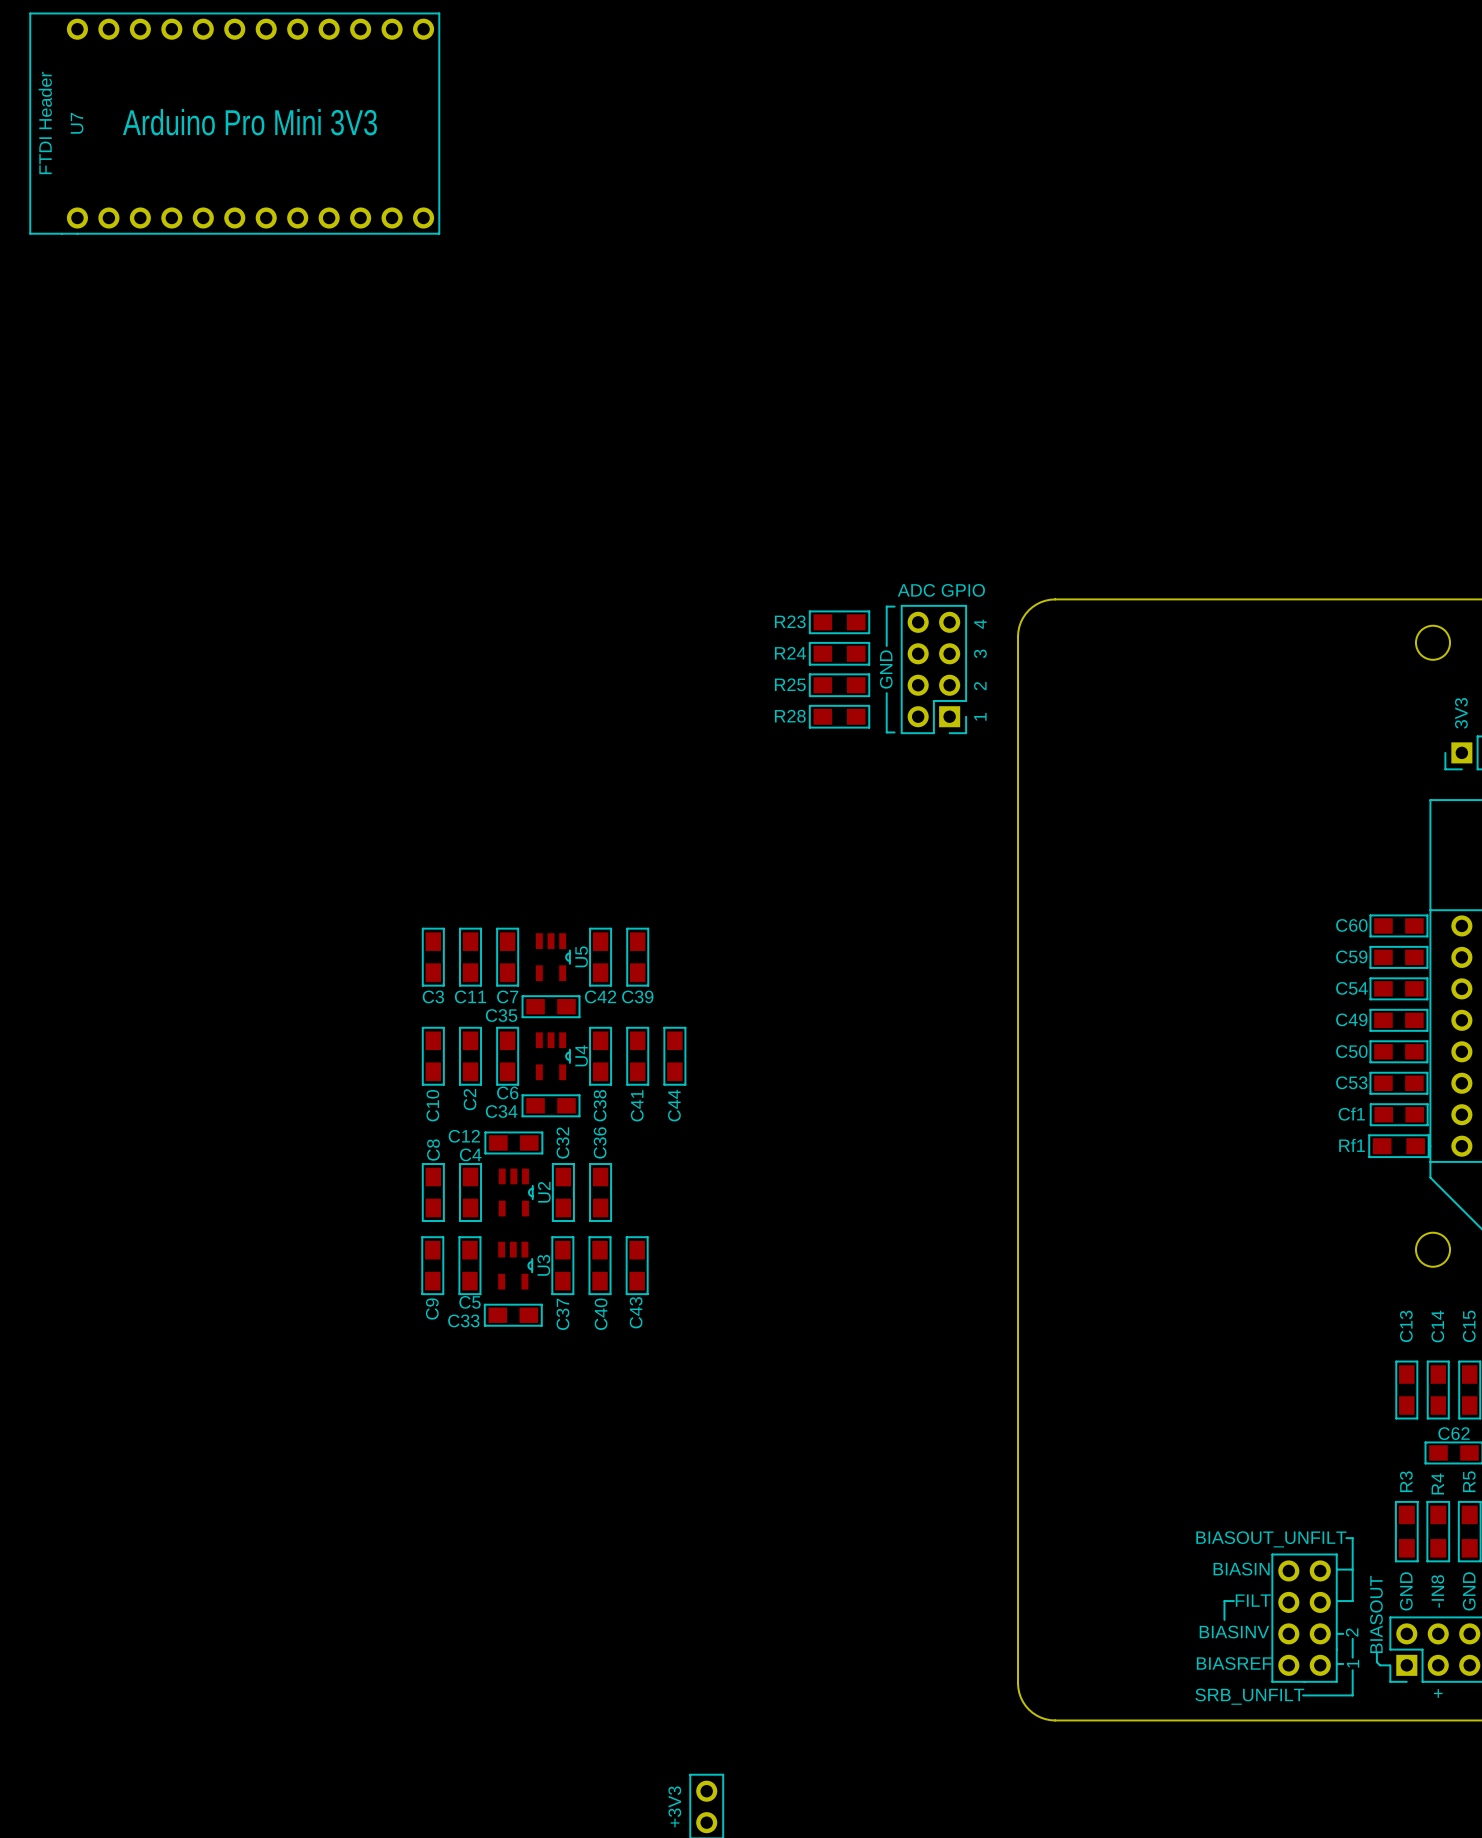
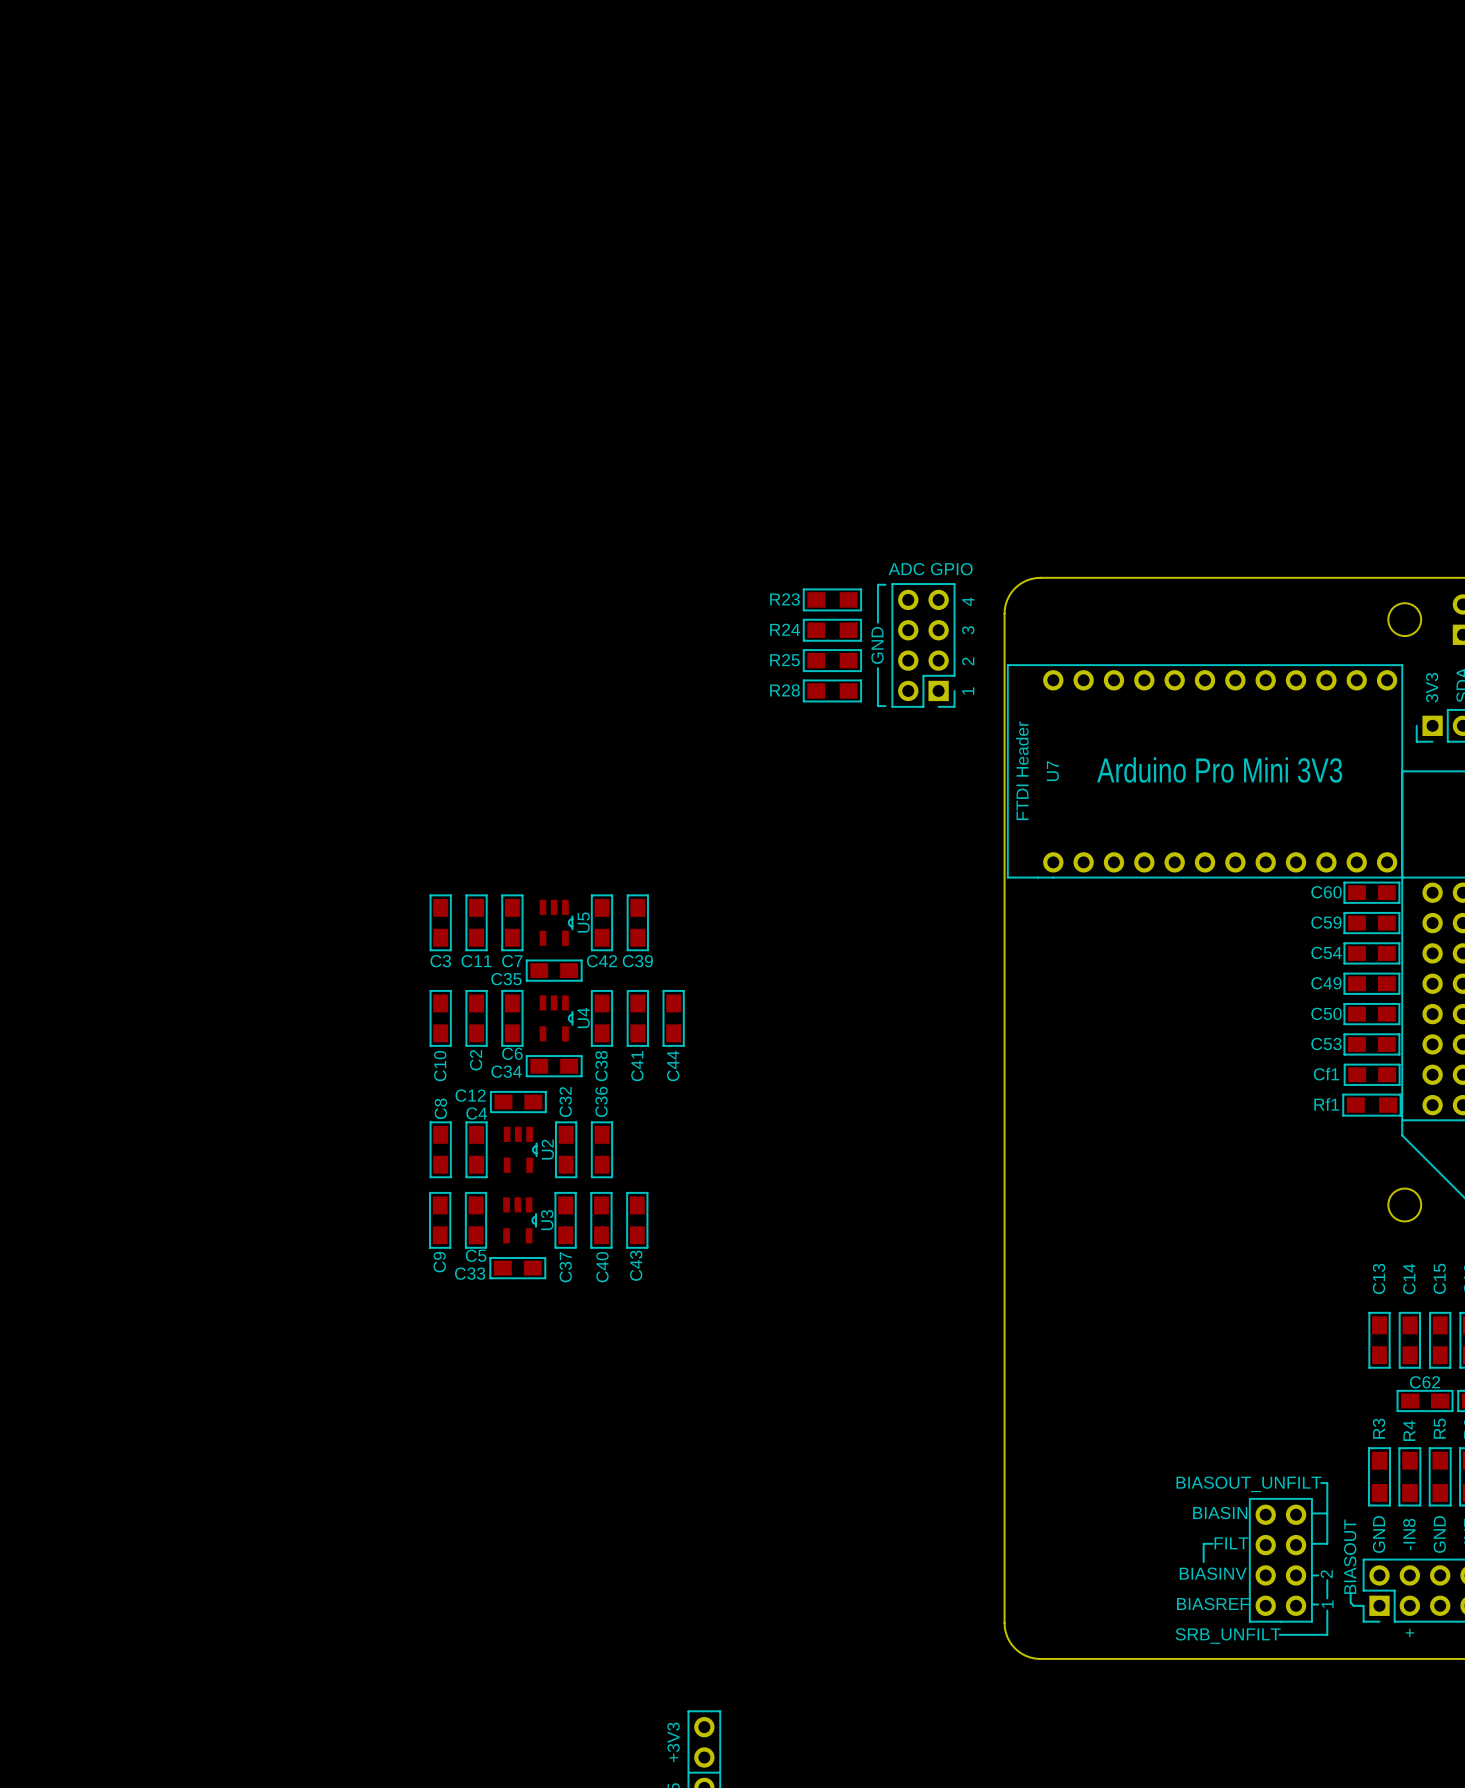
U7 position: (234, 123) -> (1205, 771)

